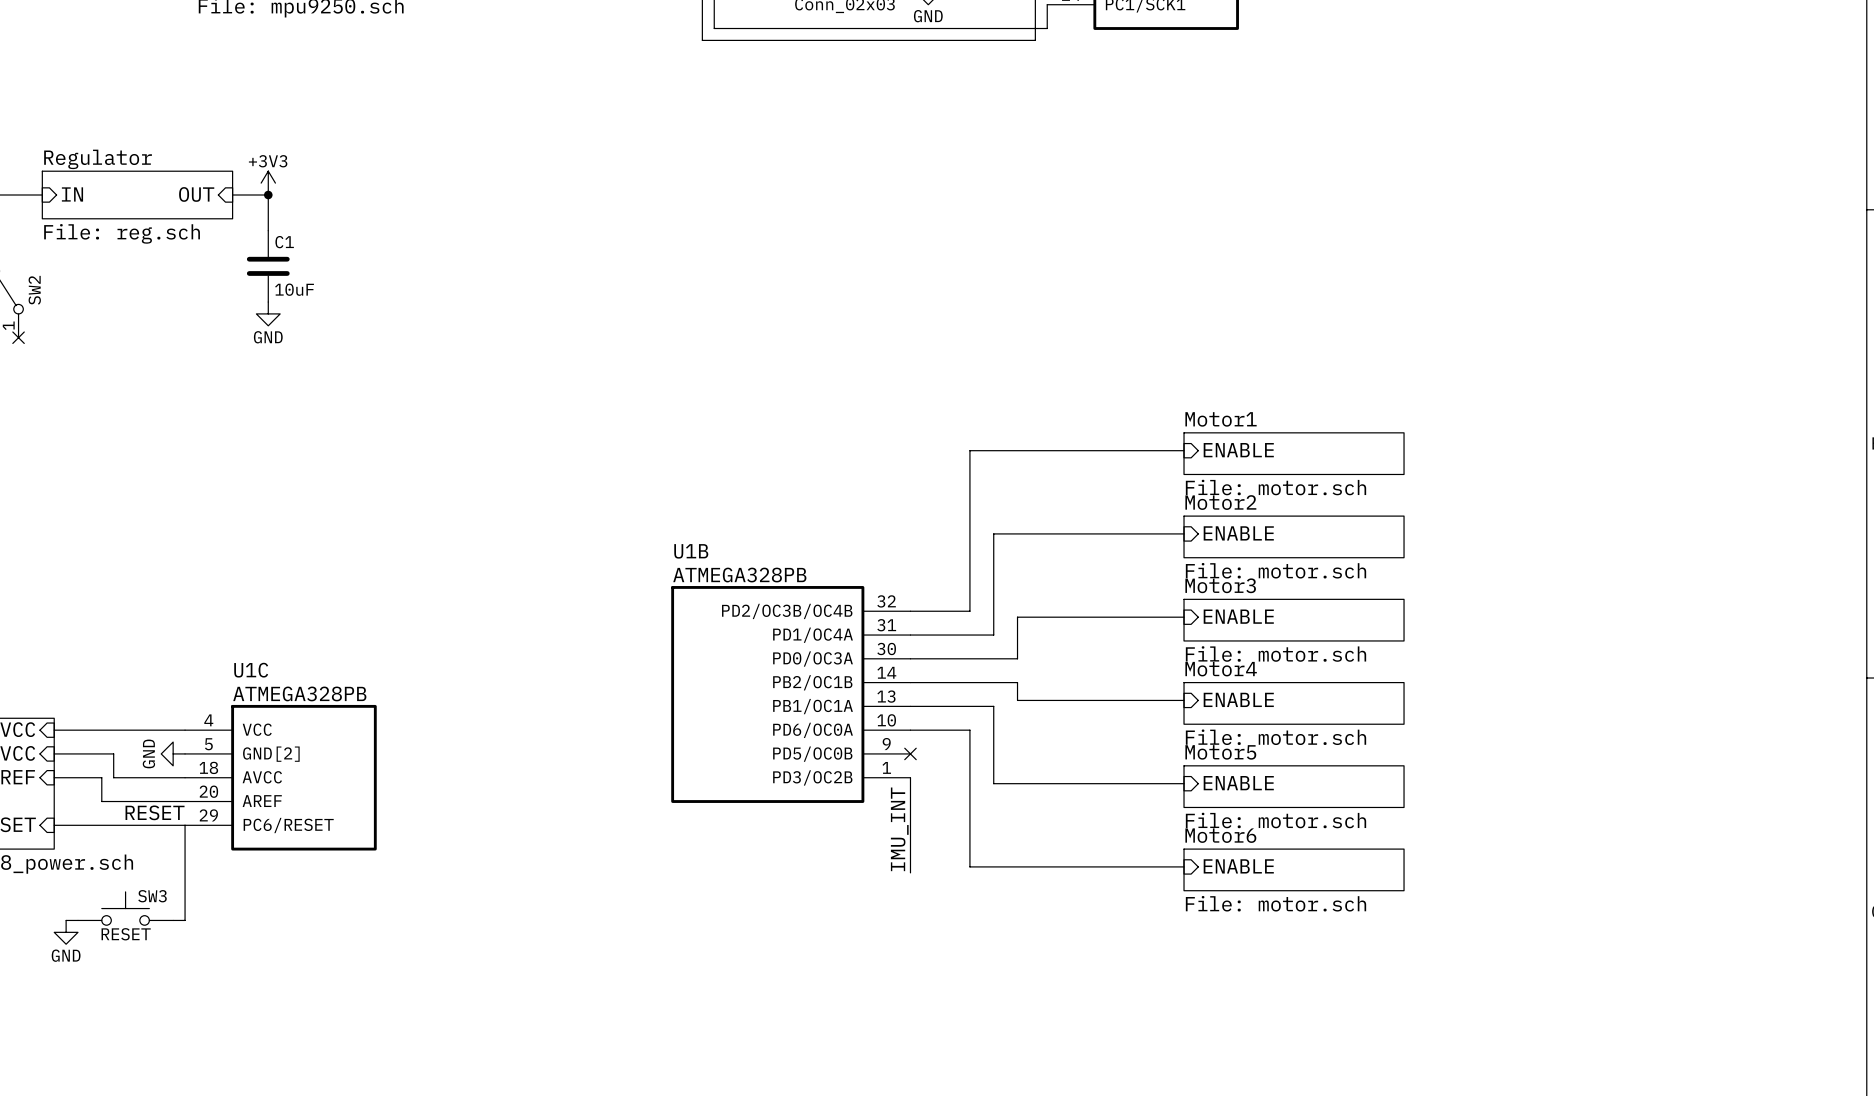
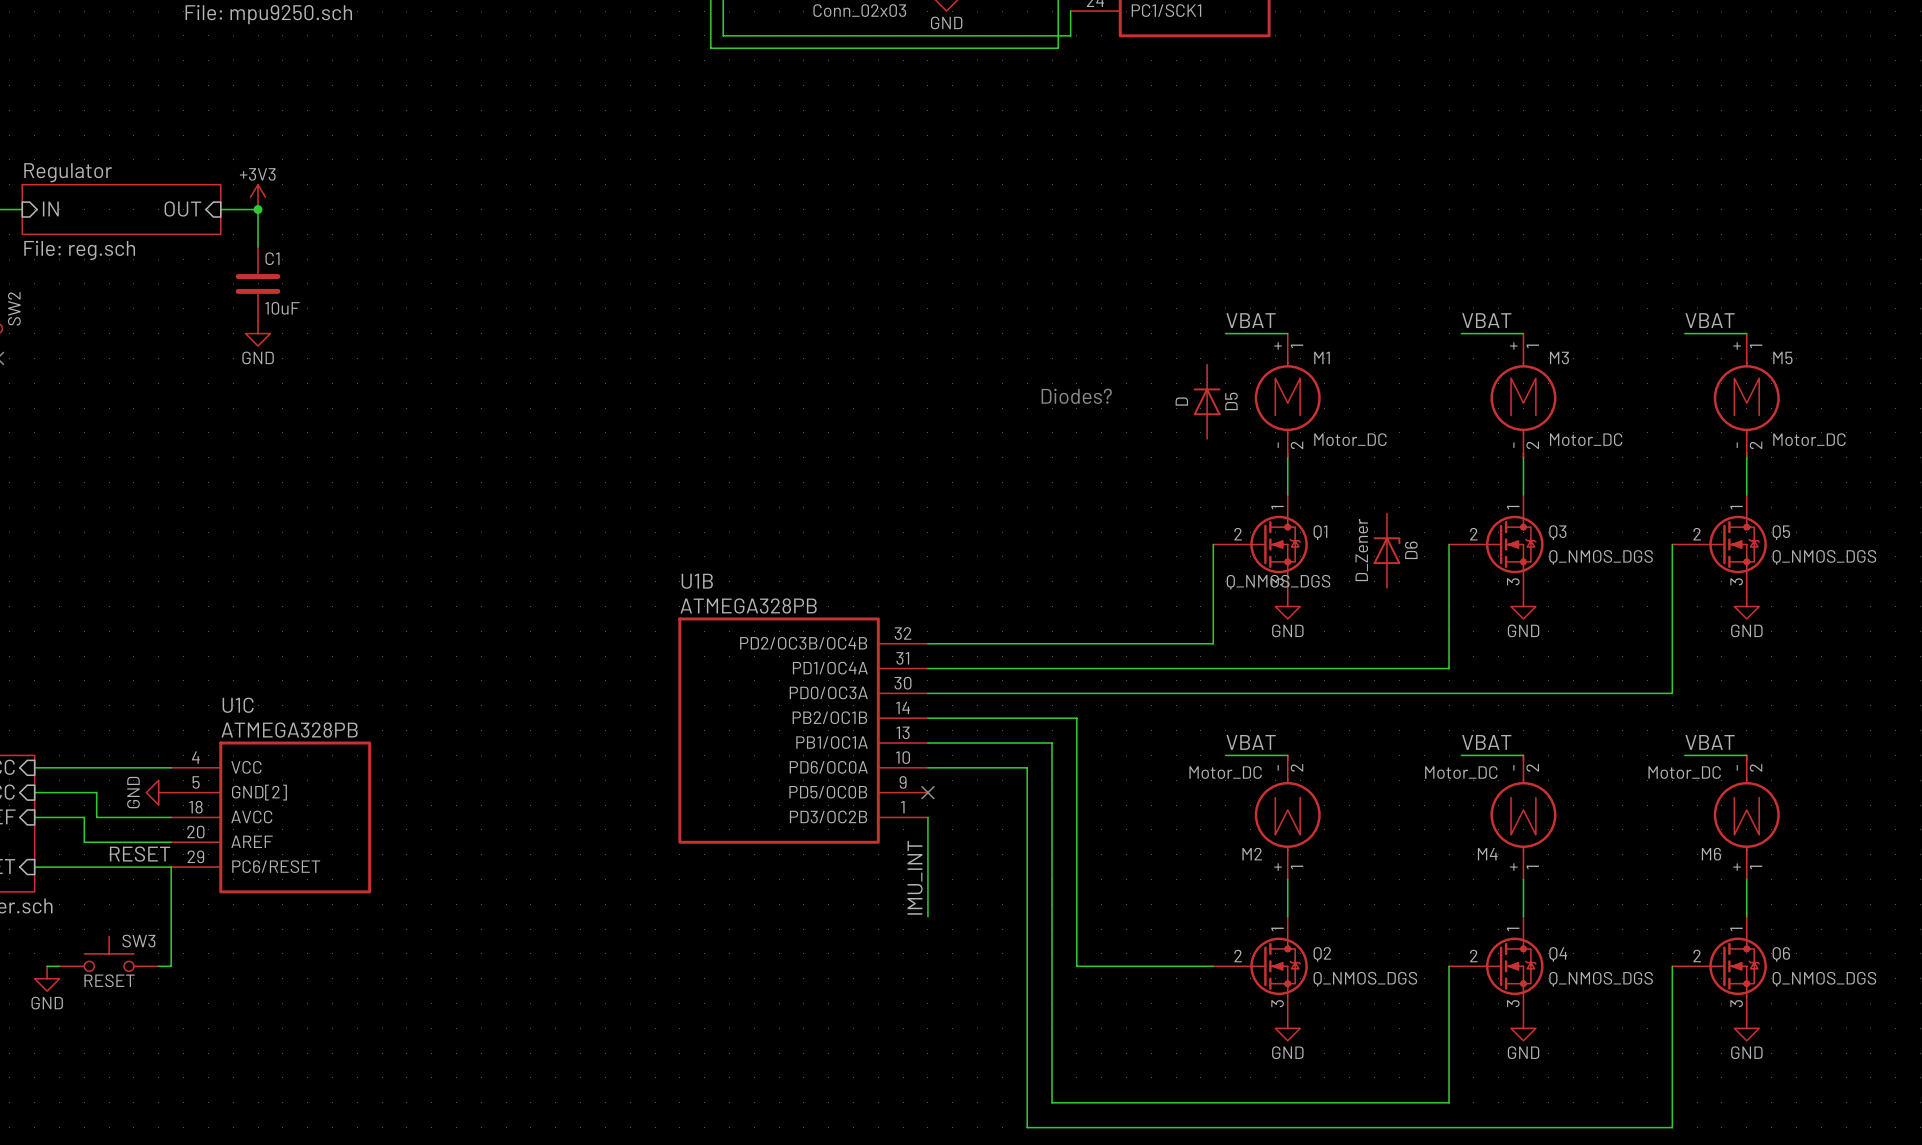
label: none -> VBAT (1251, 320)
label: none -> VBAT (1486, 320)
label: none -> VBAT (1710, 320)
wire: none -> (1225, 333) (1287, 333)
wire: none -> (1461, 333) (1523, 333)
wire: none -> (1684, 333) (1746, 333)
text: none -> Diodes? (1076, 396)
M1: none -> Motor_DC (1287, 395)
M3: none -> Motor_DC (1523, 395)
M5: none -> Motor_DC (1746, 395)
D5: none -> D (1207, 401)
wire: none -> (1287, 457) (1287, 494)
wire: none -> (1523, 457) (1523, 494)
wire: none -> (1746, 457) (1746, 494)
wire: (1184, 450) (969, 450) (969, 611) -> (1213, 544) (1213, 643) (989, 643)
sheet pin: ENABLE (1238, 450) -> none
sheet Motor1: File: motor.sch (1294, 453) -> none
Q1: none -> Q_NMOS_DGS (1260, 544)
Q3: none -> Q_NMOS_DGS (1496, 544)
Q5: none -> Q_NMOS_DGS (1719, 544)
D6: none -> D_Zener (1386, 550)
wire: (1184, 533) (993, 533) (993, 635) -> (1449, 544) (1449, 668) (1014, 668)
sheet pin: ENABLE (1238, 533) -> none
sheet Motor2: File: motor.sch (1294, 536) -> none
power symbol: none -> GND (1287, 606)
power symbol: none -> GND (1523, 606)
power symbol: none -> GND (1746, 606)
sheet pin: ENABLE (1238, 616) -> none
wire: (1184, 617) (1017, 617) (1017, 658) -> (1672, 544) (1672, 693) (1039, 693)
sheet Motor3: File: motor.sch (1294, 620) -> none
wire: (1017, 682) (1017, 700) (1184, 700) -> (1039, 718) (1076, 718) (1076, 966) (1213, 966)
sheet pin: ENABLE (1238, 699) -> none
sheet Motor4: File: motor.sch (1294, 703) -> none
label: none -> VBAT (1251, 742)
label: none -> VBAT (1486, 742)
label: none -> VBAT (1710, 742)
wire: (993, 706) (993, 783) (1184, 783) -> (1014, 743) (1052, 743) (1052, 1102) (1449, 1102) (1449, 966)
wire: none -> (1225, 755) (1287, 755)
wire: none -> (1461, 755) (1523, 755)
wire: none -> (1684, 755) (1746, 755)
wire: (969, 730) (969, 866) (1184, 866) -> (989, 767) (1027, 767) (1027, 1127) (1672, 1127) (1672, 966)
M2: none -> Motor_DC (1287, 817)
M4: none -> Motor_DC (1523, 817)
M6: none -> Motor_DC (1746, 817)
sheet pin: ENABLE (1238, 783) -> none
sheet Motor5: File: motor.sch (1294, 786) -> none
wire: none -> (1287, 879) (1287, 916)
wire: none -> (1523, 879) (1523, 916)
wire: none -> (1746, 879) (1746, 916)
sheet pin: ENABLE (1238, 866) -> none
sheet Motor6: File: motor.sch (1294, 869) -> none
Q2: none -> Q_NMOS_DGS (1260, 966)
Q4: none -> Q_NMOS_DGS (1496, 966)
Q6: none -> Q_NMOS_DGS (1719, 966)
power symbol: none -> GND (1287, 1028)
power symbol: none -> GND (1523, 1028)
power symbol: none -> GND (1746, 1028)

